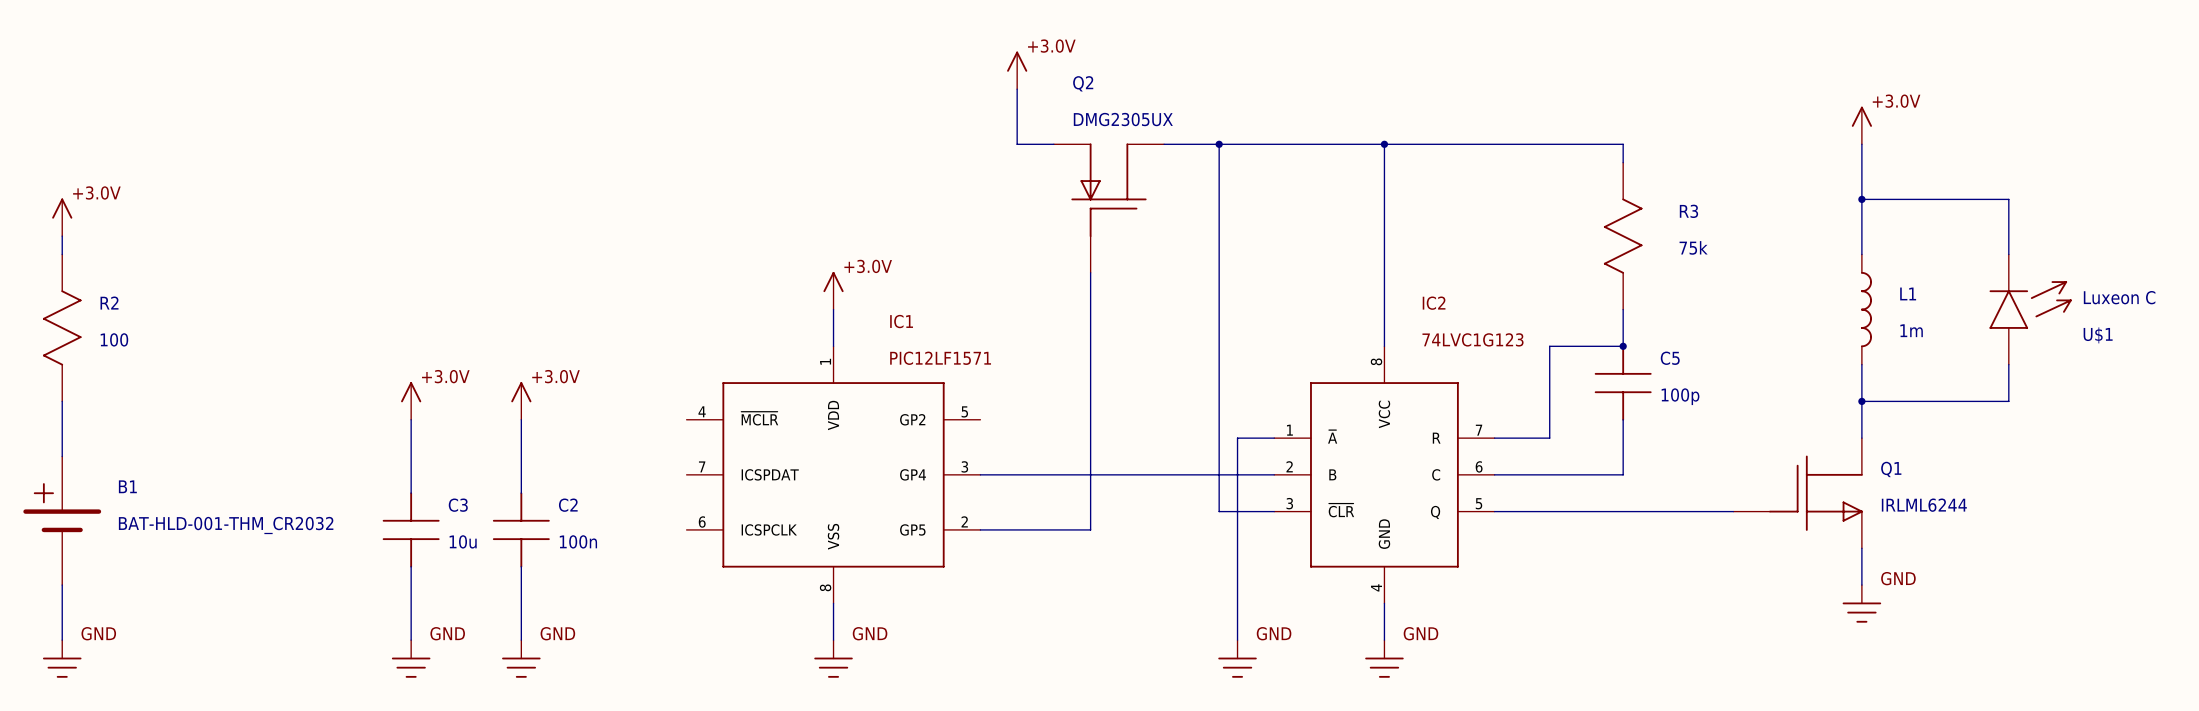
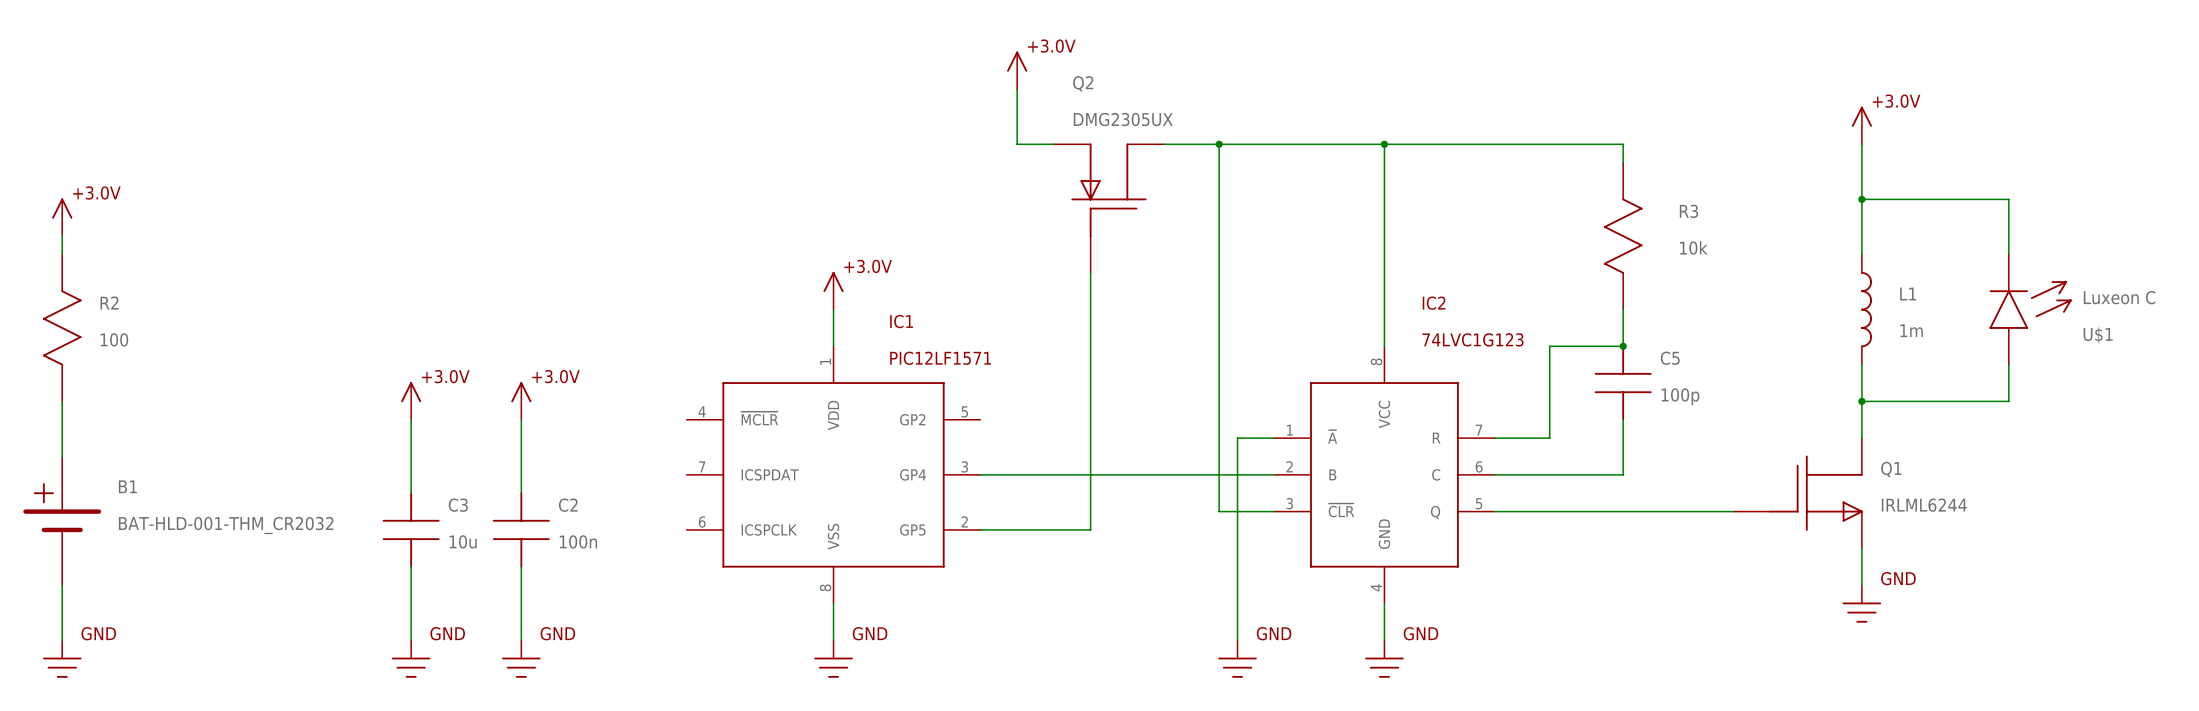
R3 value: 75k (1693, 247) -> 10k (1693, 247)

